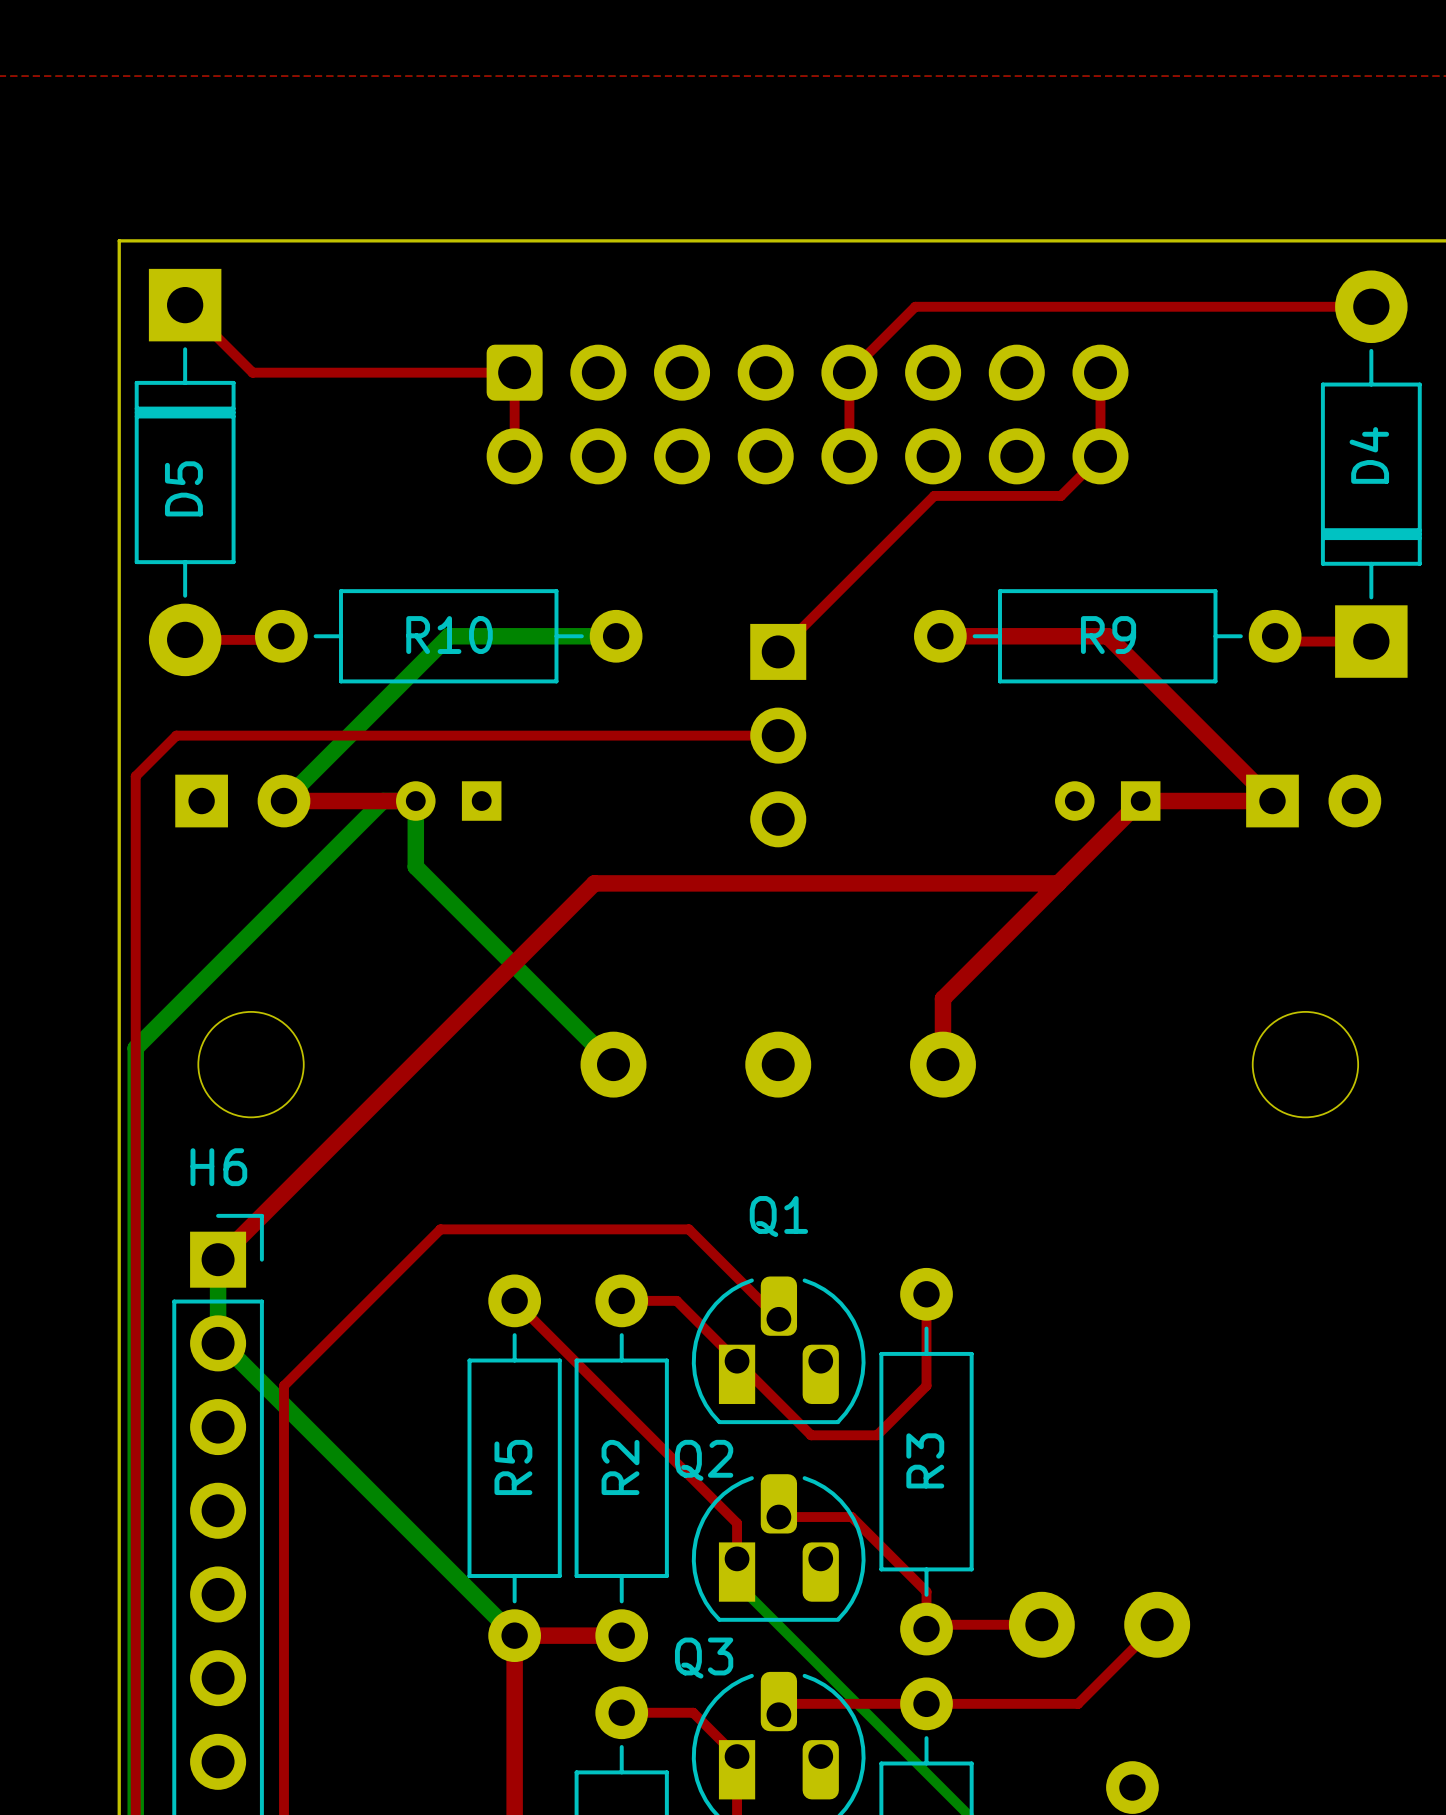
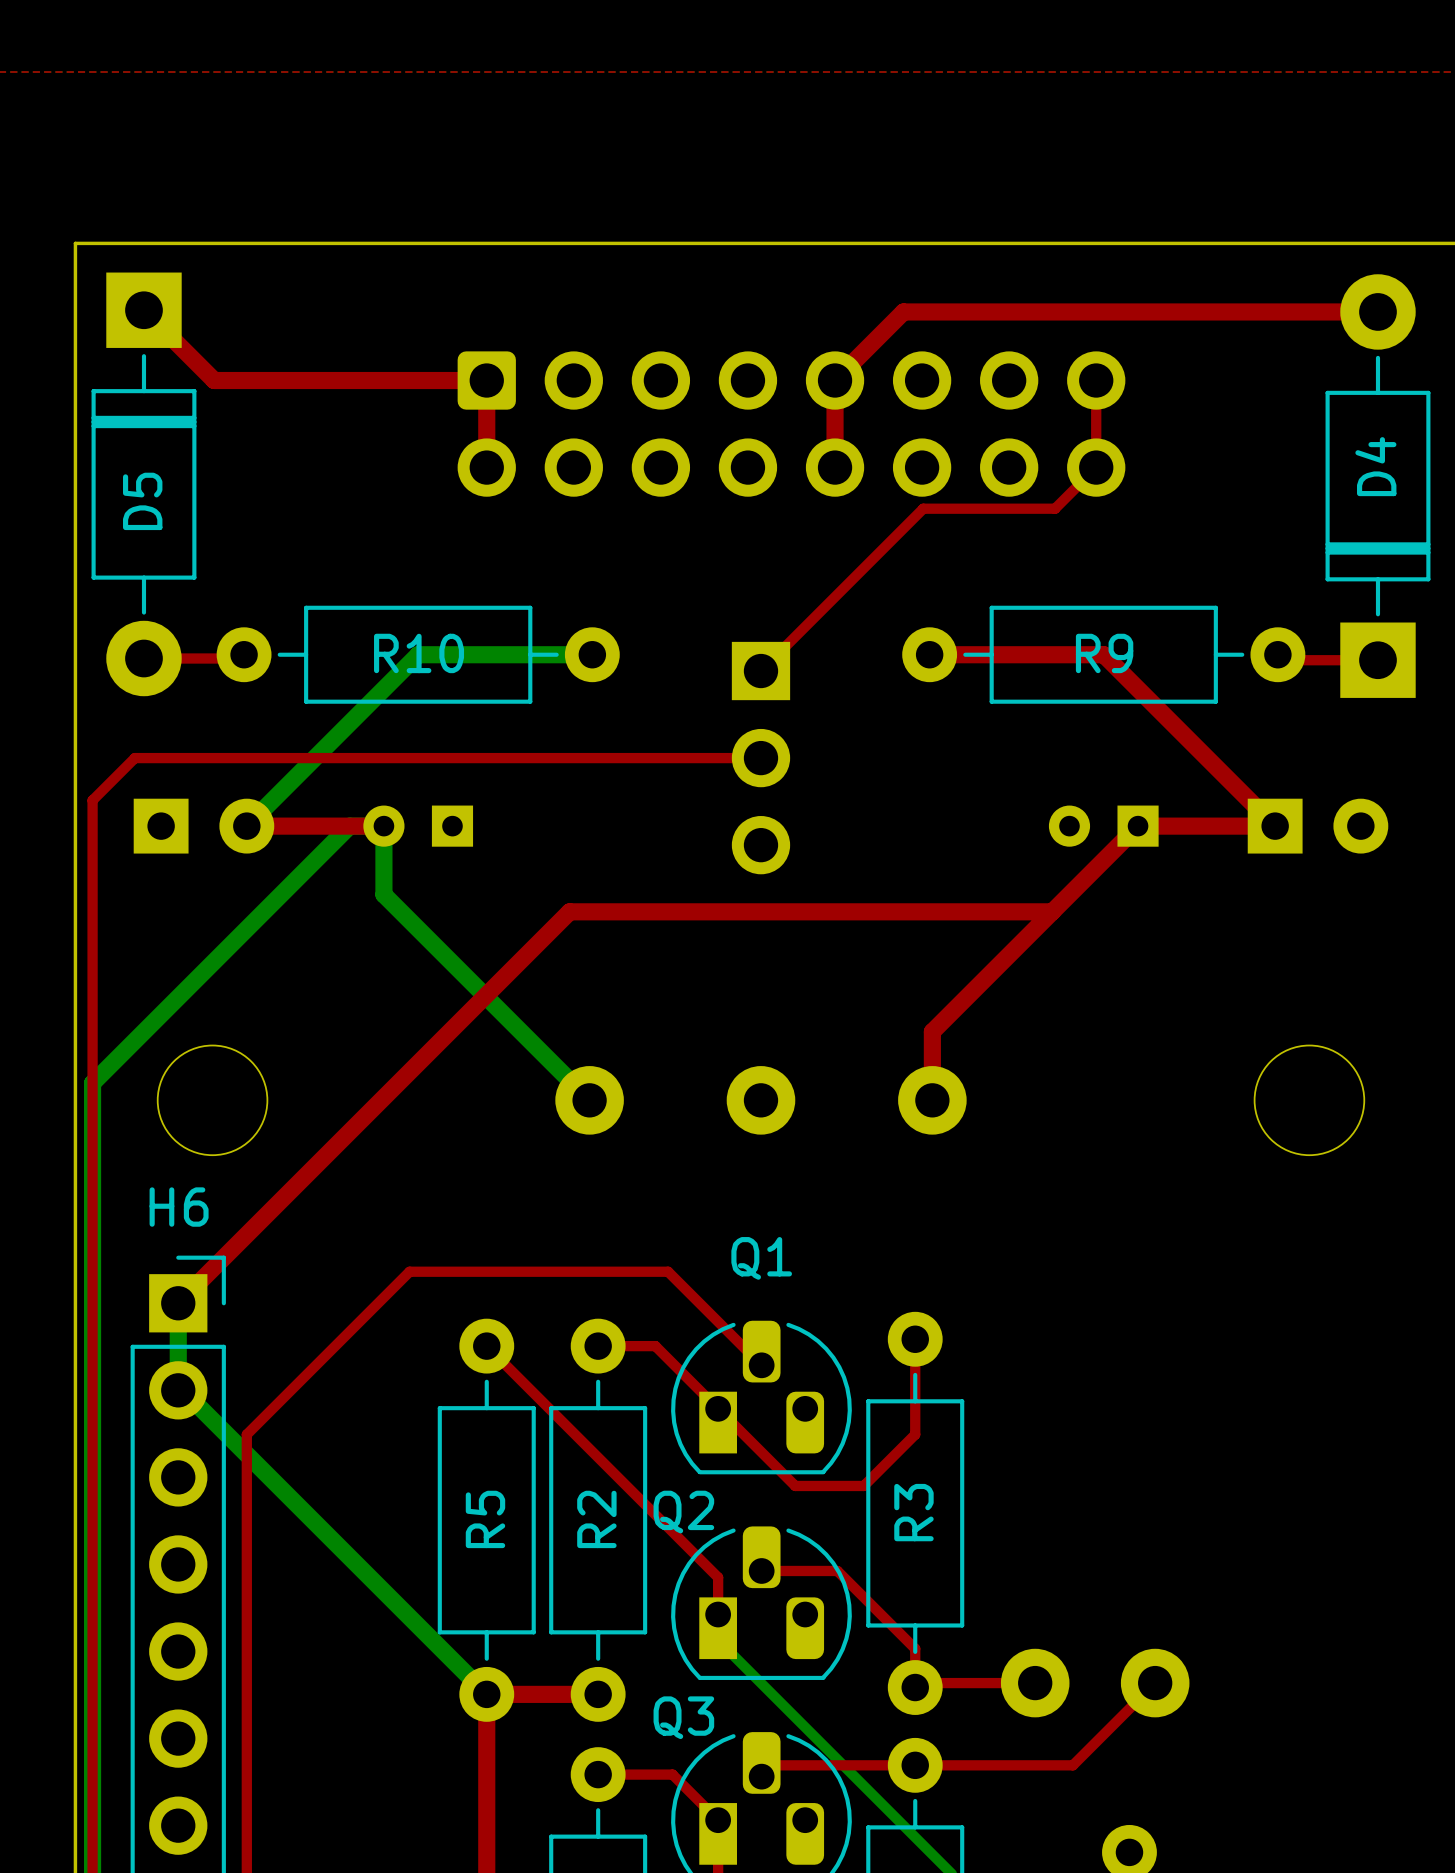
top track width: thin (185, 305) (252, 372) (514, 372) (514, 456) -> thick (143, 310) (214, 380) (486, 380) (486, 467)
top track width: thin (1371, 306) (915, 306) (849, 372) (849, 456) -> thick (1377, 311) (903, 311) (835, 380) (835, 467)

